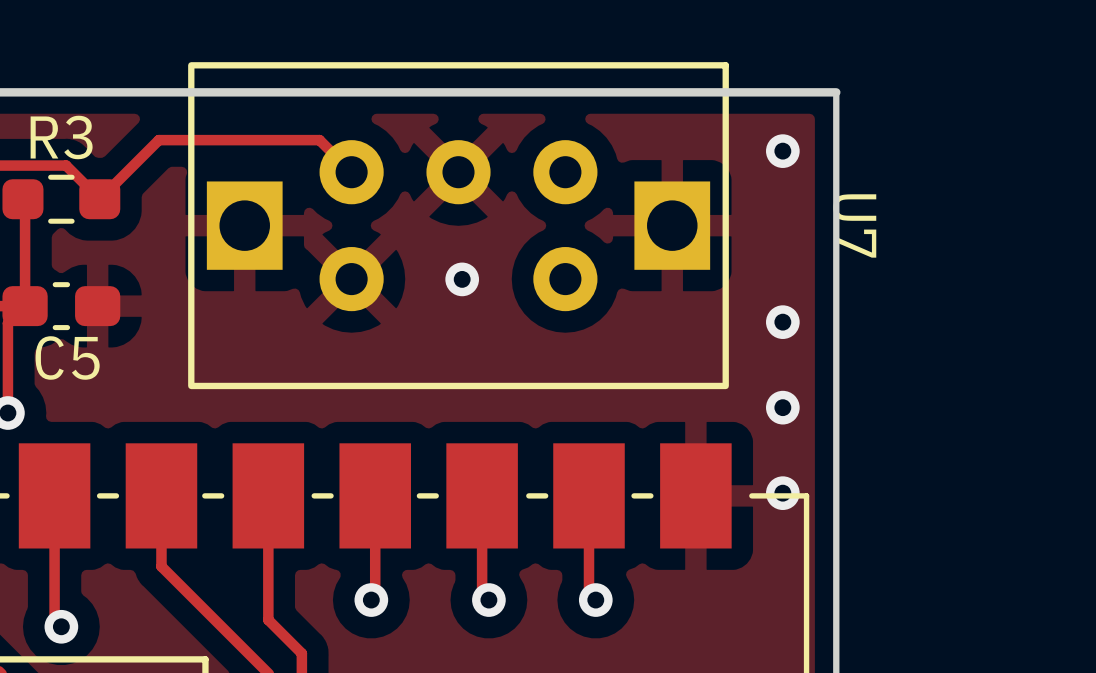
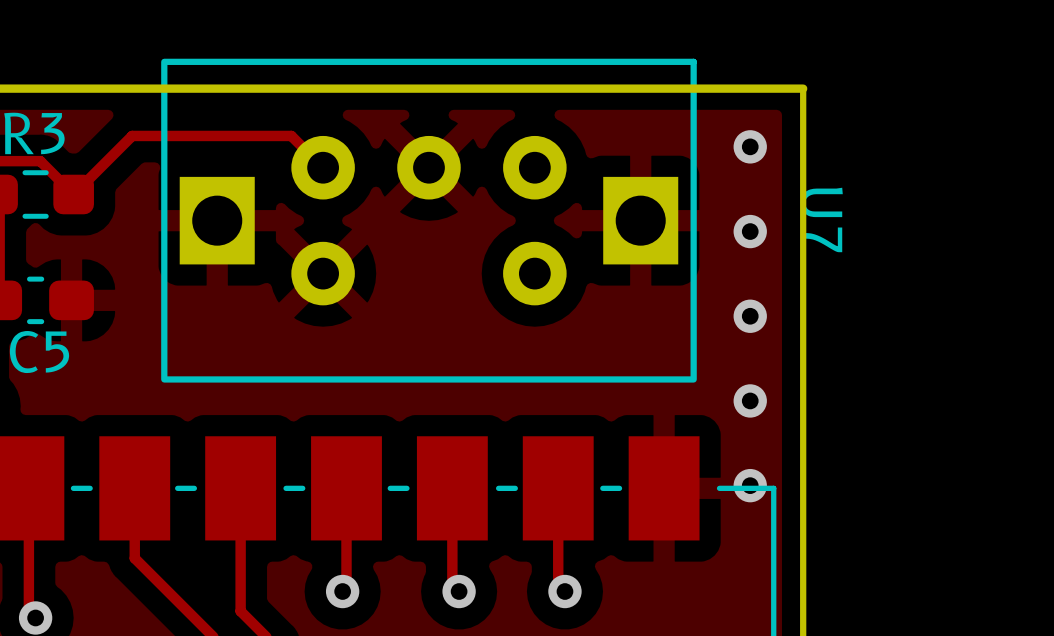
via: none -> (750, 231)
via: (462, 279) -> none

